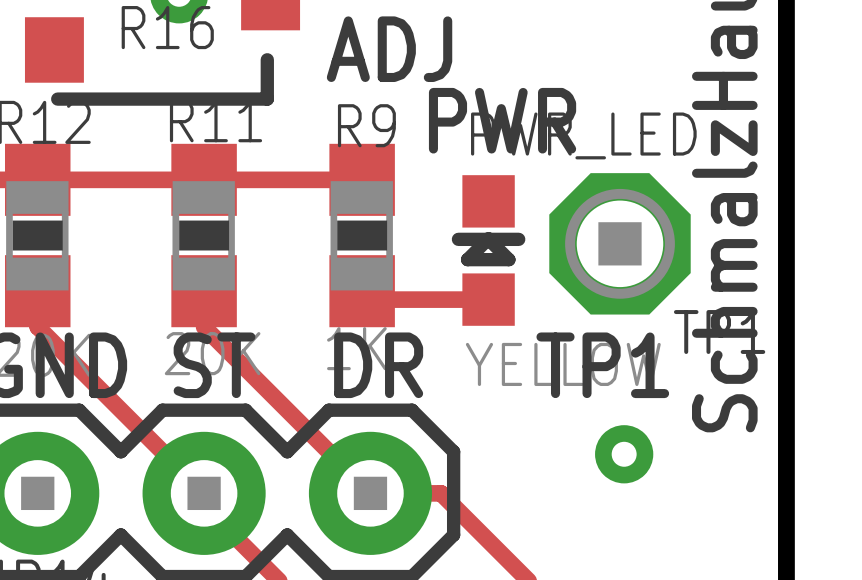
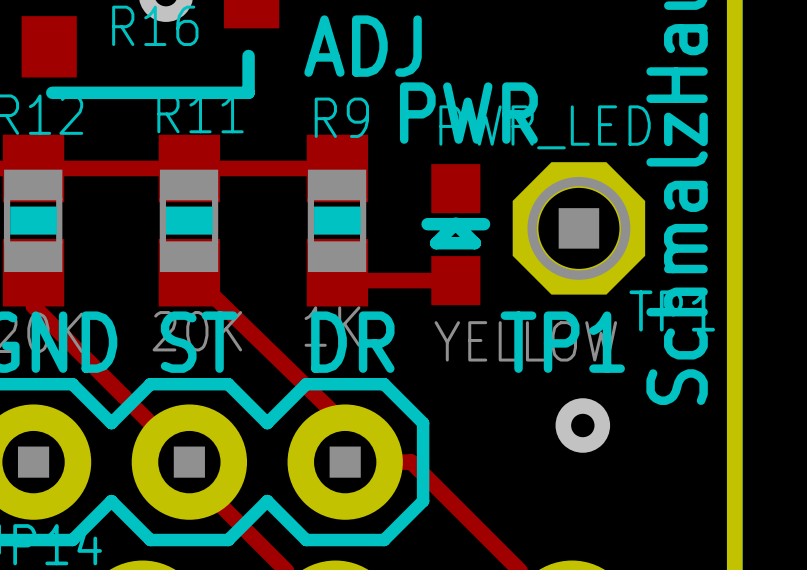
track: (204, 327) (329, 452) (370, 452) -> (189, 272) (345, 424)

